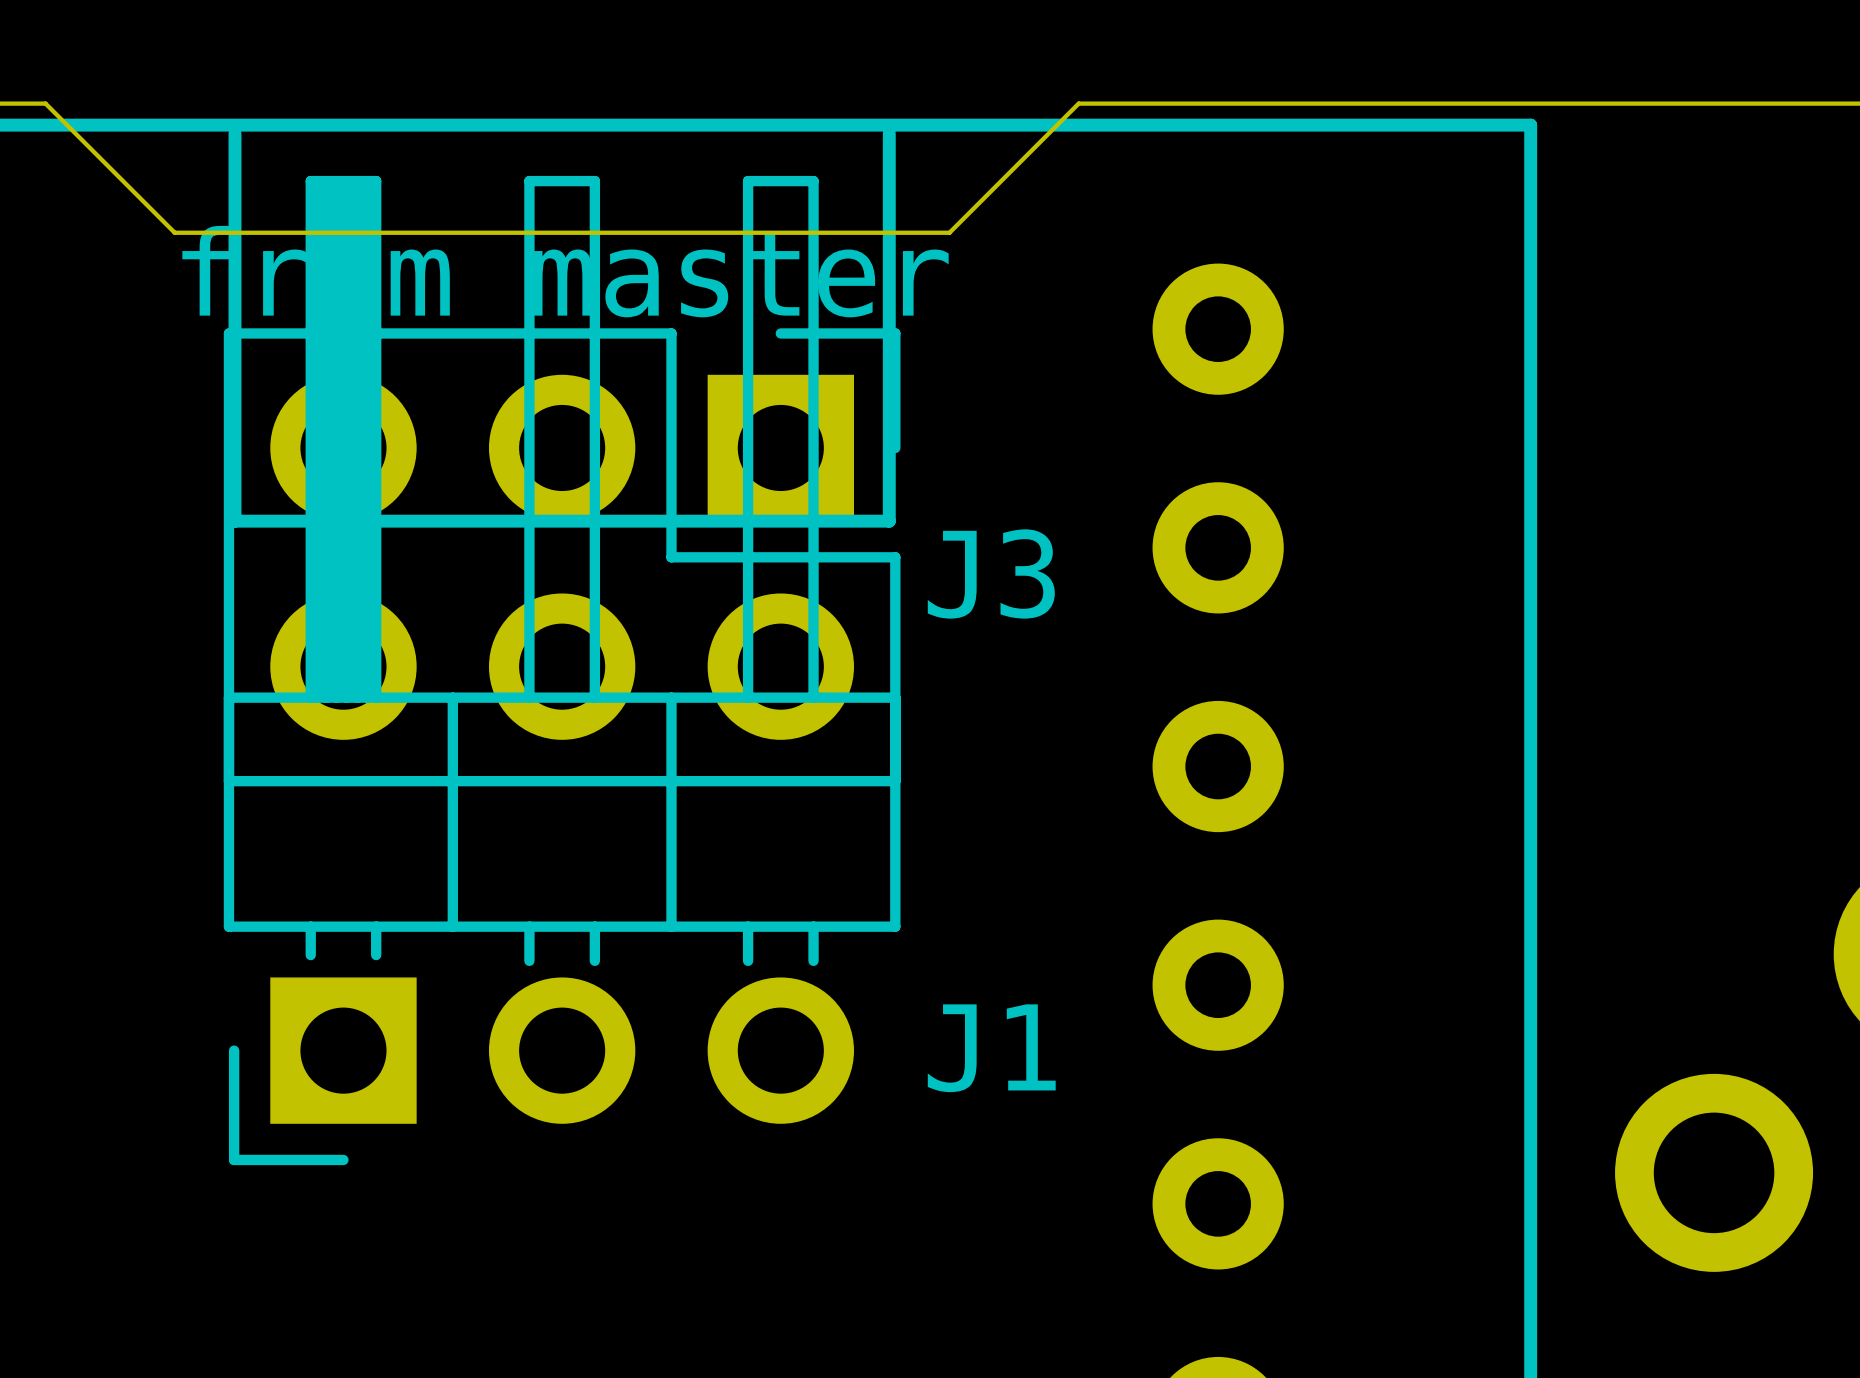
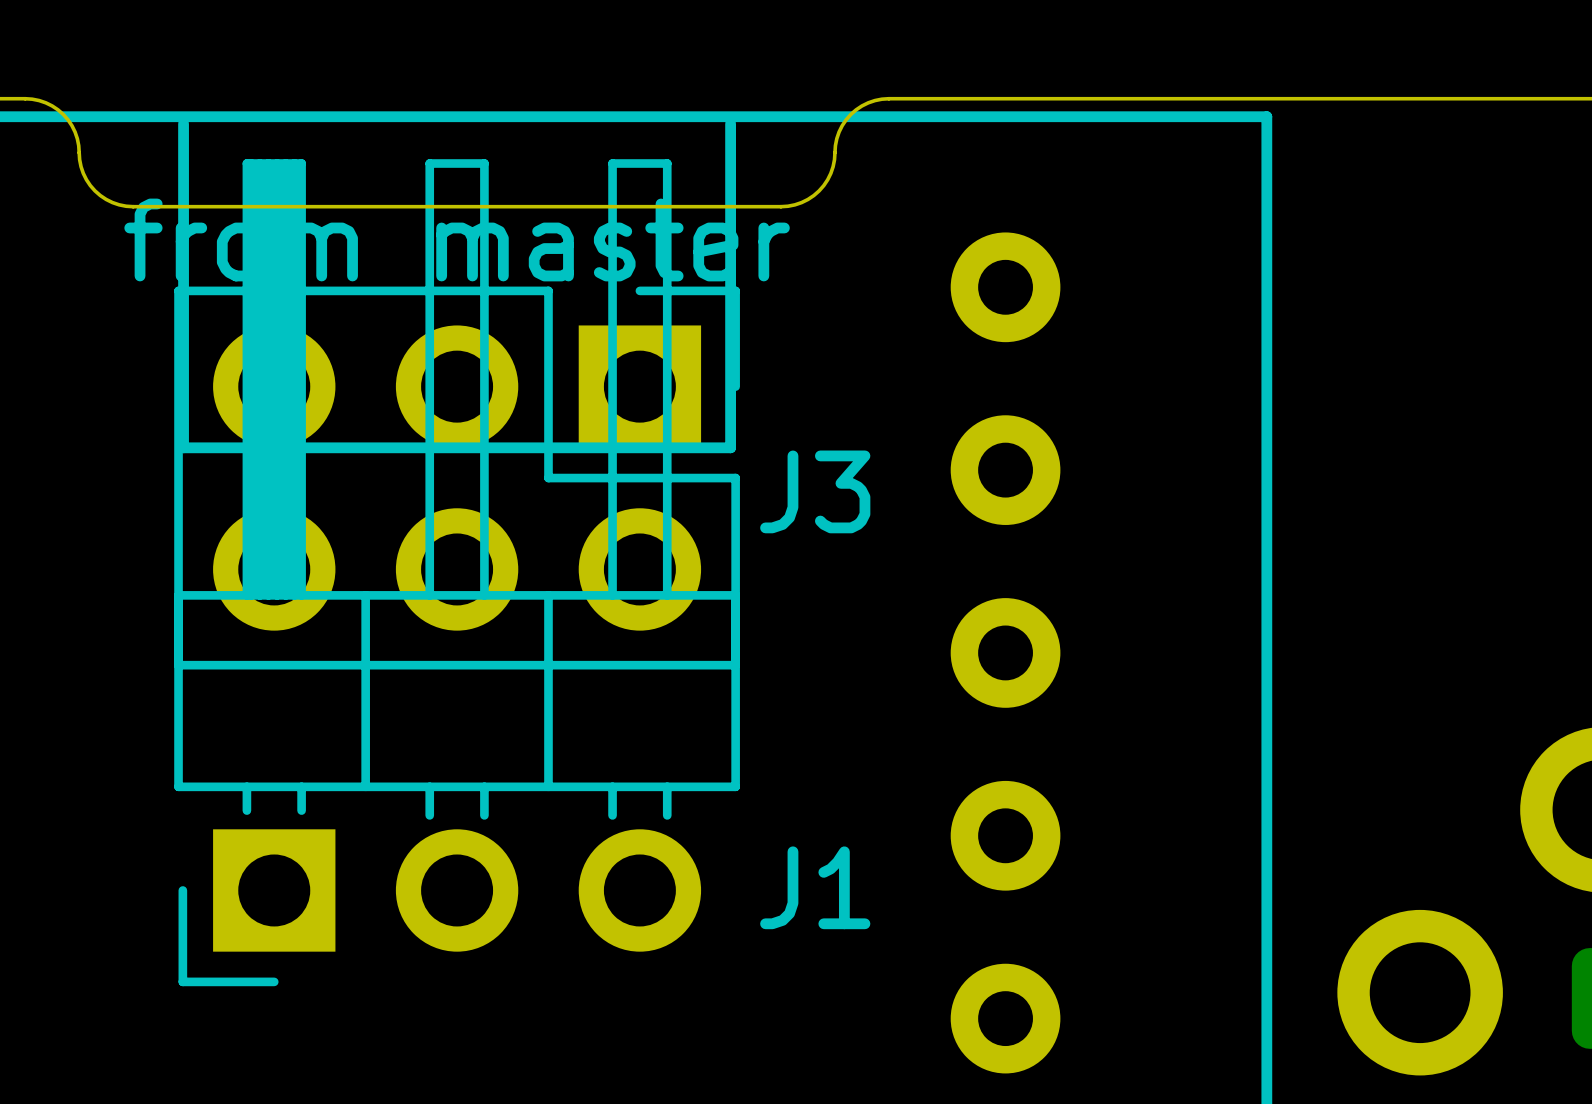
board edge: (45, 103) (174, 232) -> (25, 98) (45, 102) (63, 114) (75, 132) (81, 166) (90, 185) (100, 195) (112, 202) (133, 206)
board edge: (1078, 103) (949, 232) -> (888, 98) (868, 102) (850, 114) (839, 132) (833, 166) (823, 185) (813, 195) (801, 202) (780, 206)

